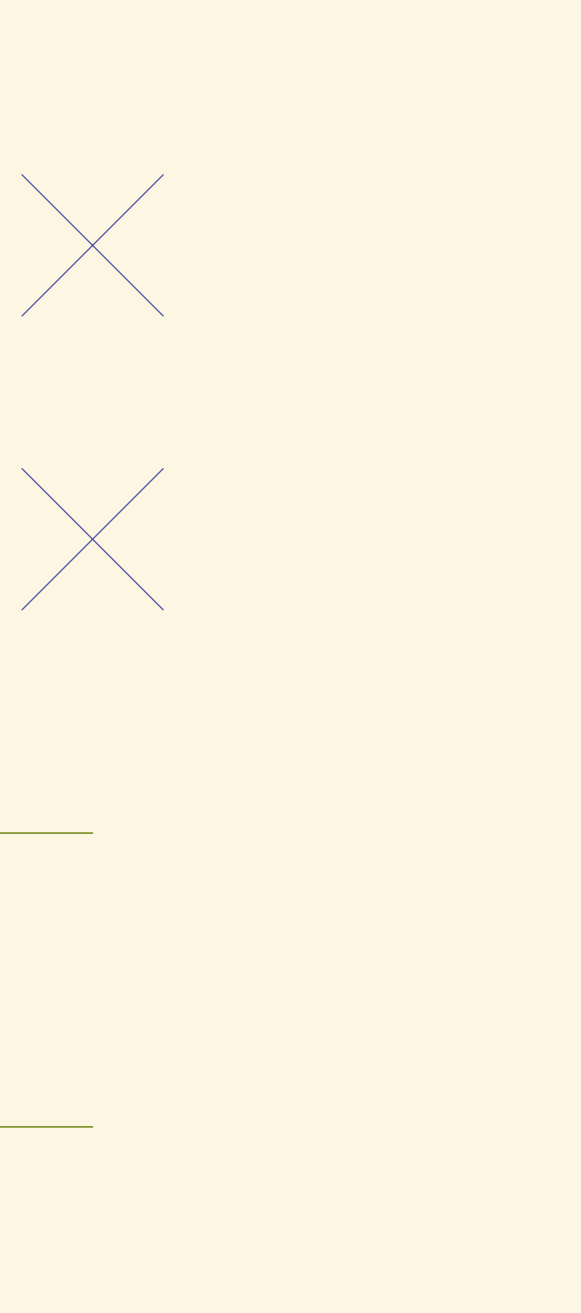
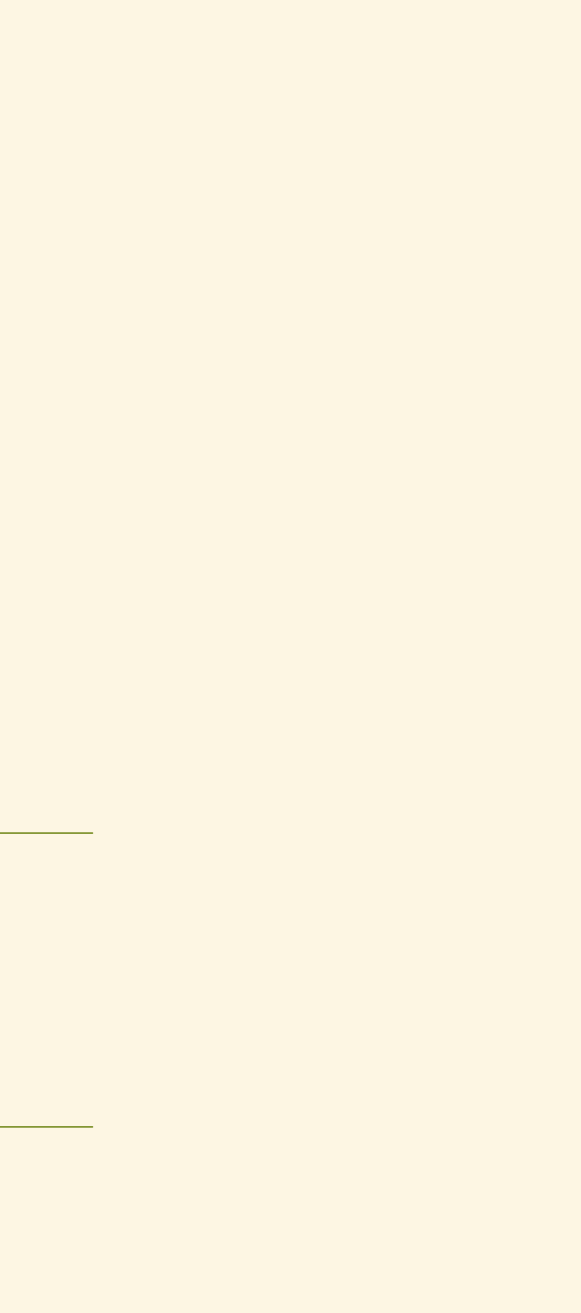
no-connect mark: (92, 245) -> none
no-connect mark: (92, 539) -> none

